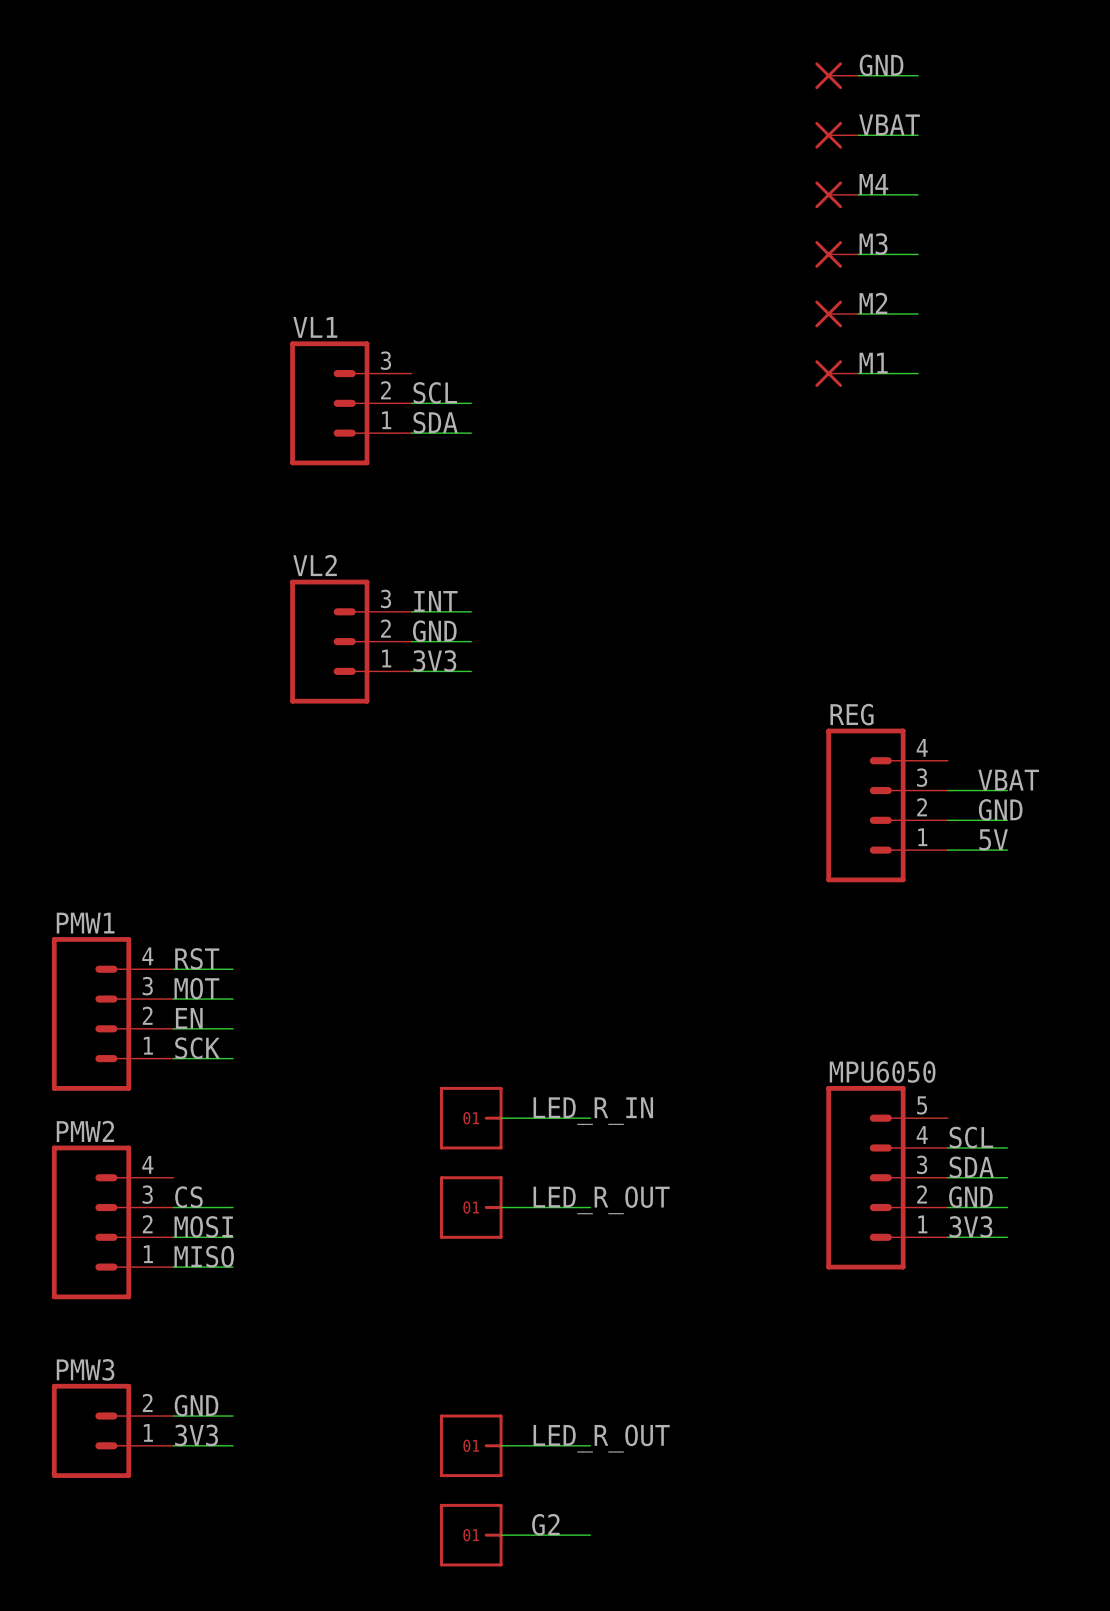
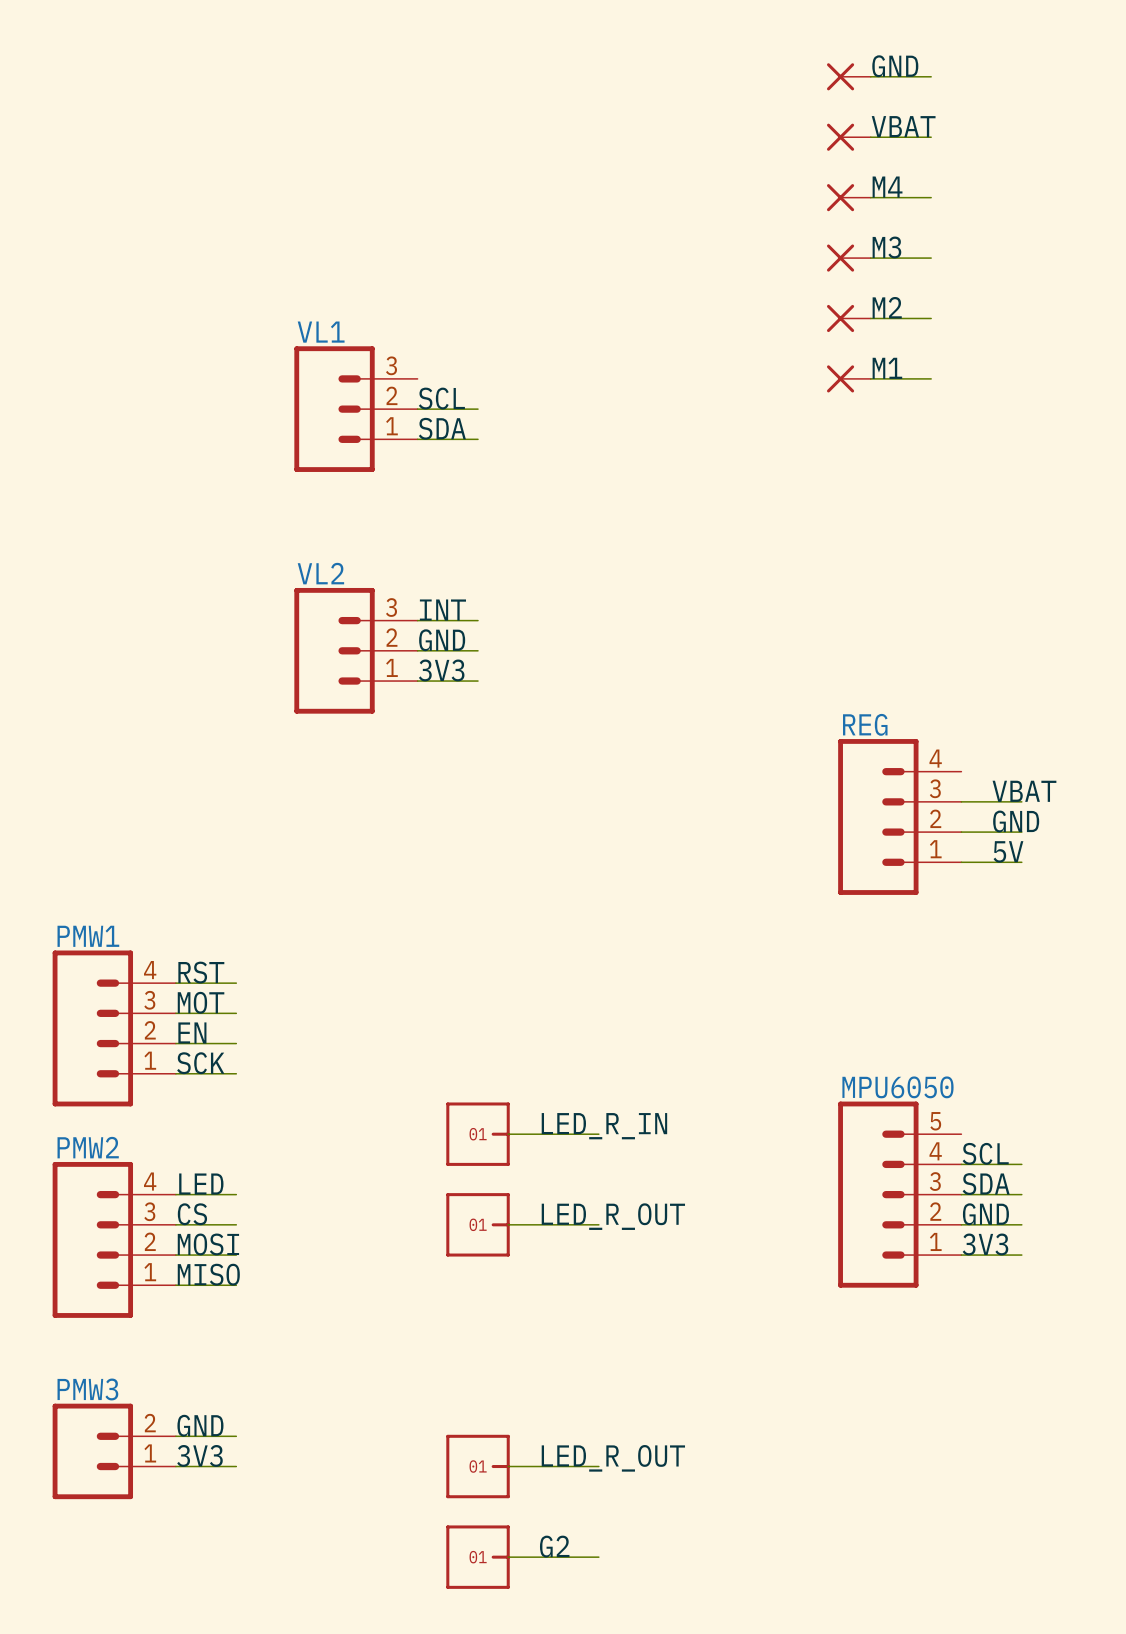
label: none -> LED (201, 1184)
wire: none -> (175, 1194) (236, 1194)

